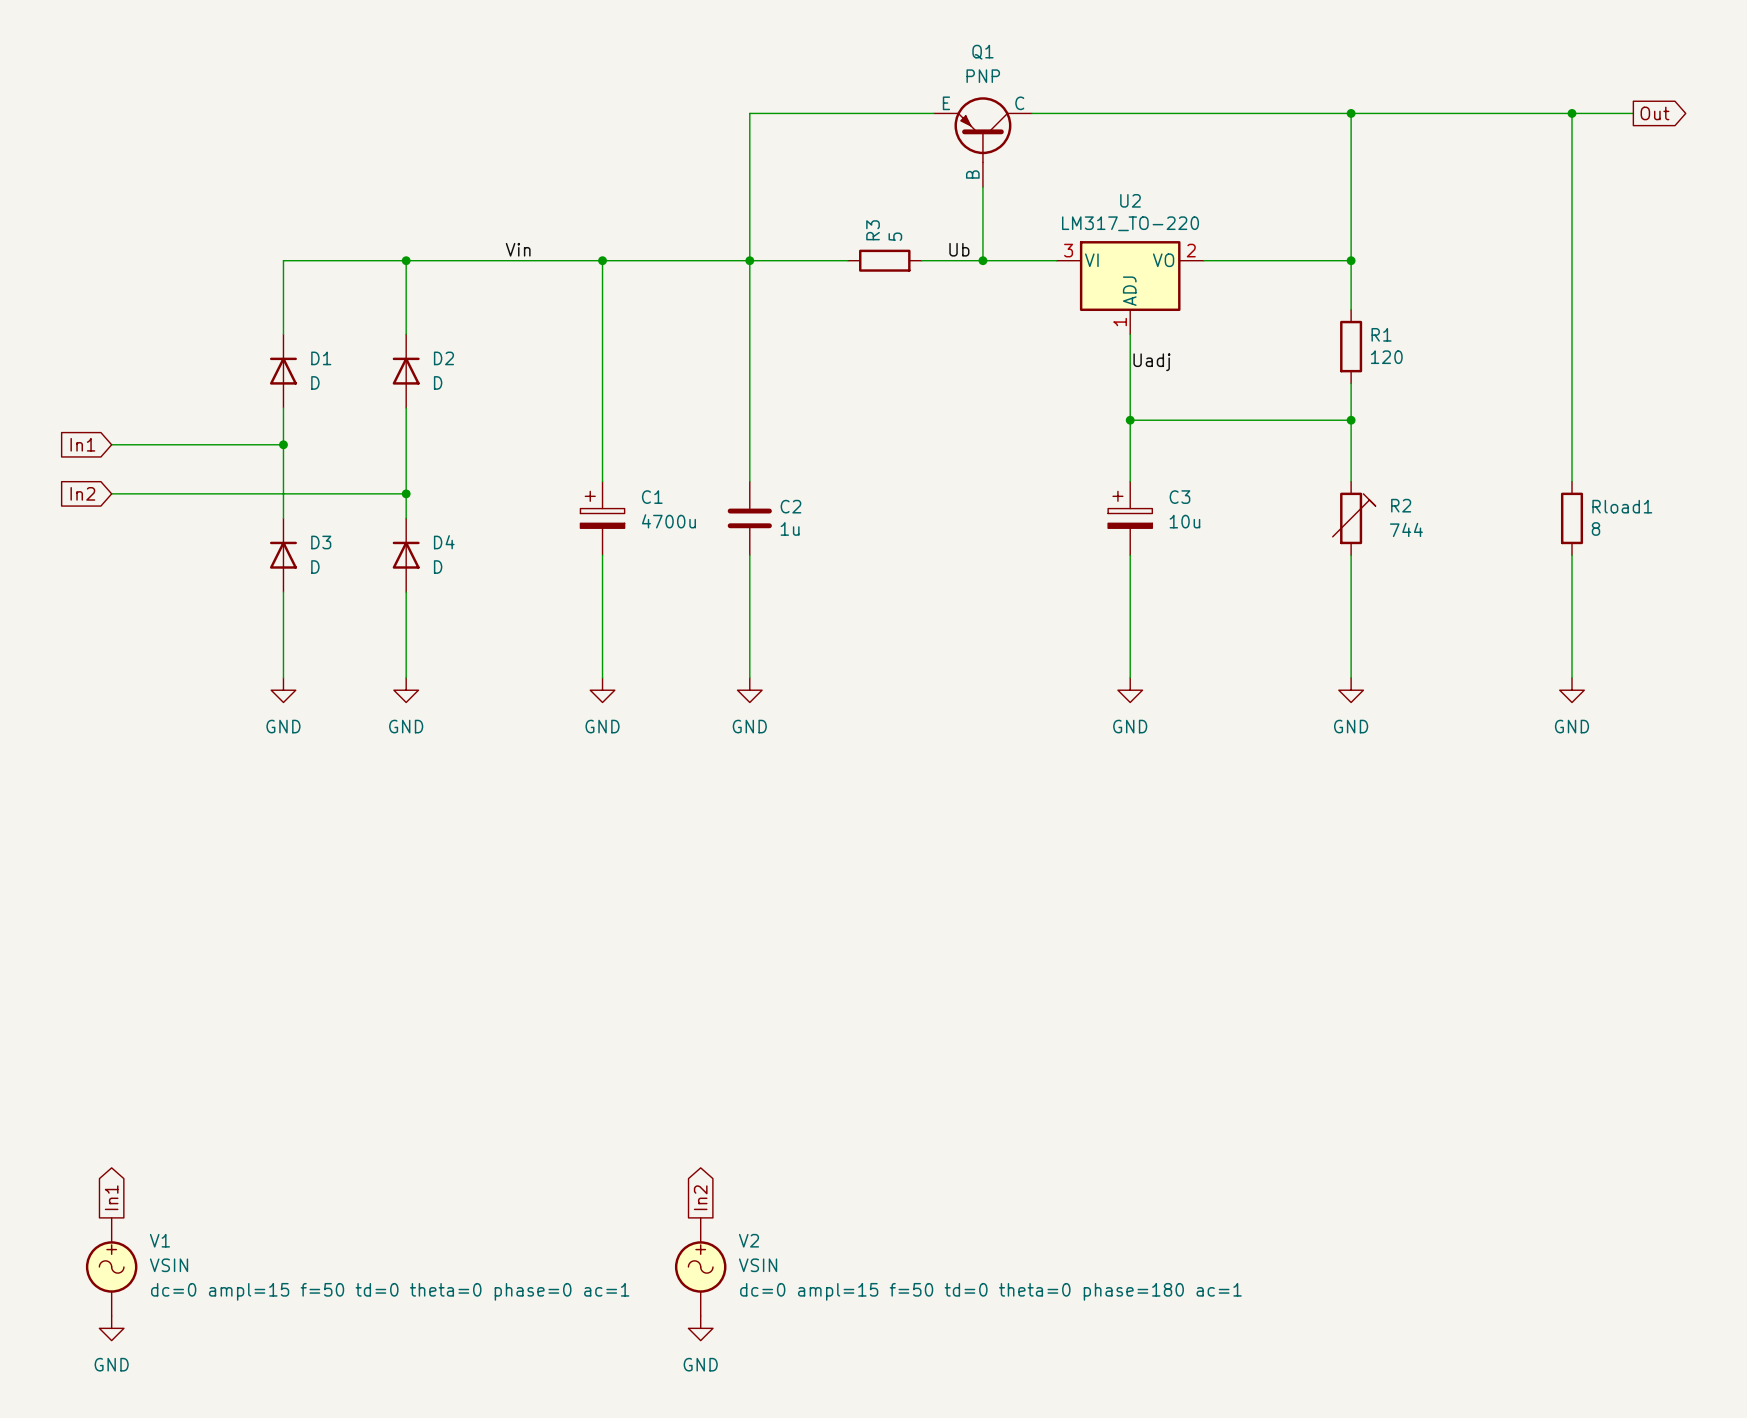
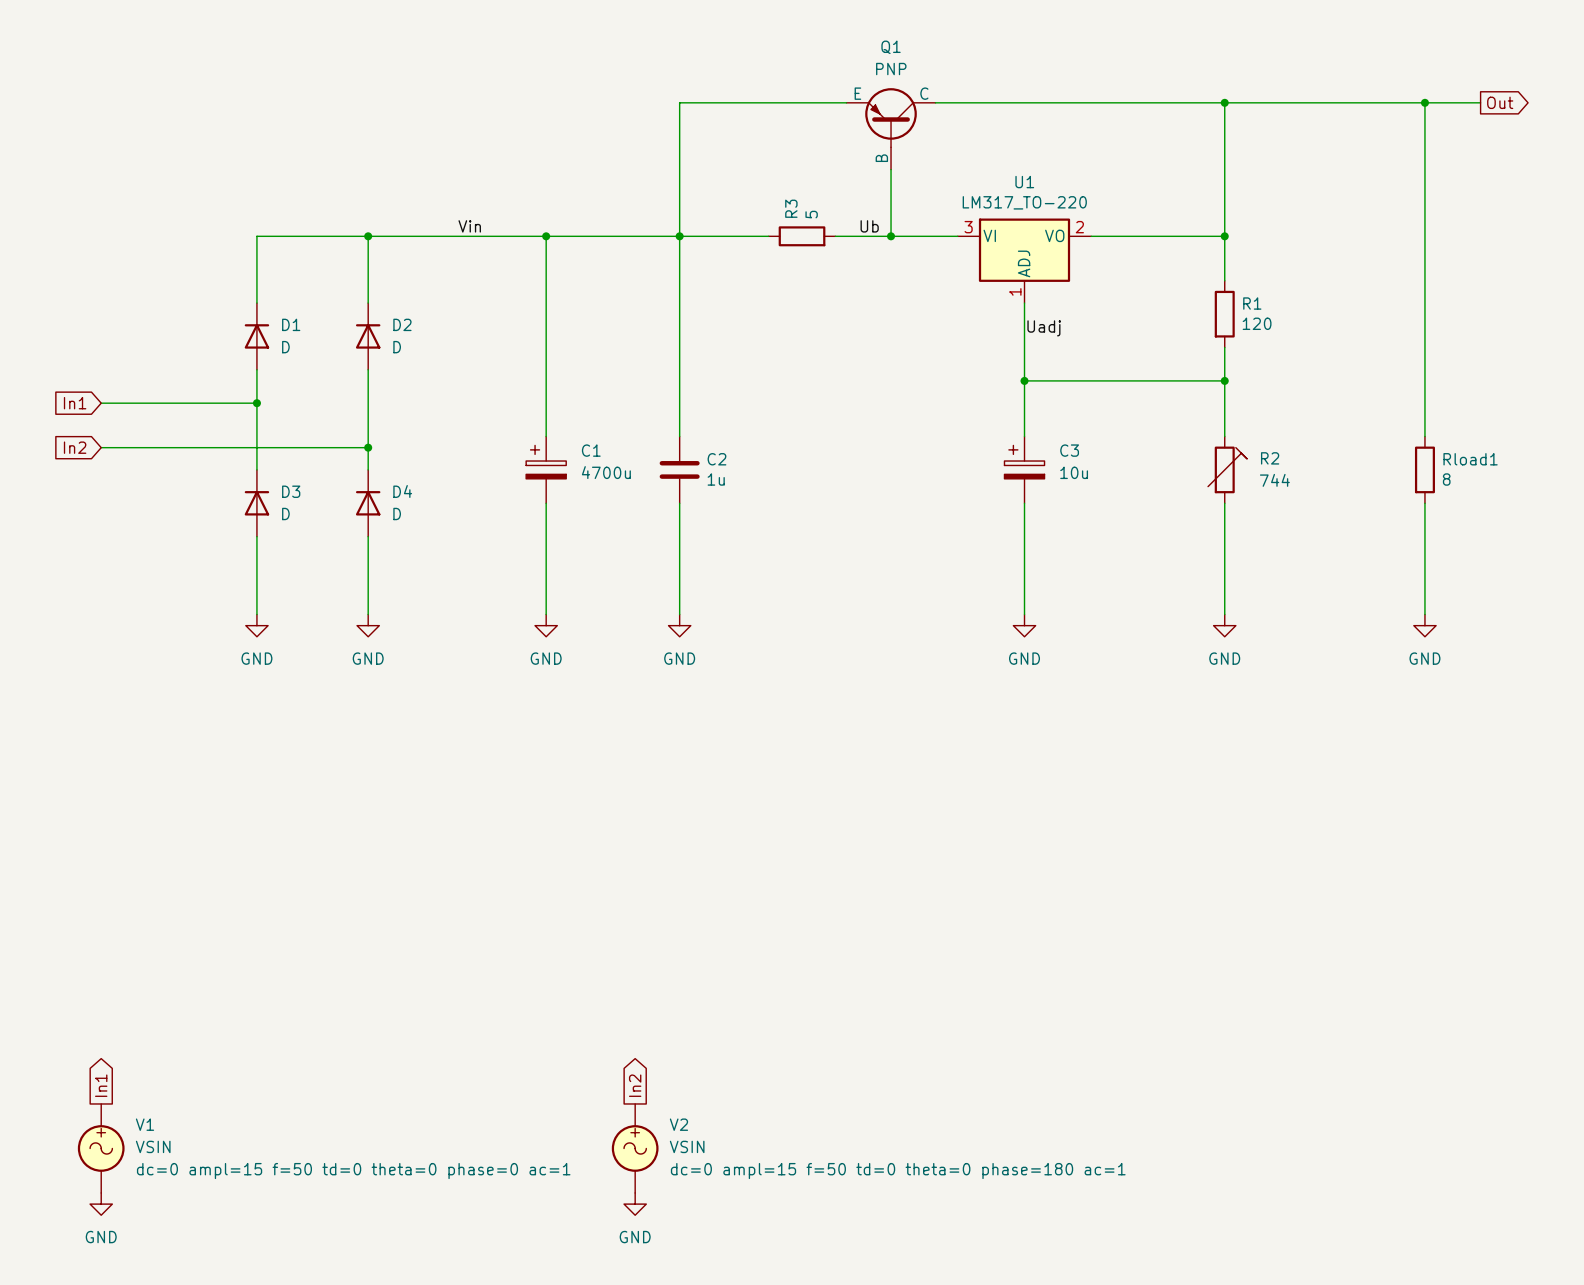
U2 name: U2 (1130, 200) -> U1 (1024, 182)

